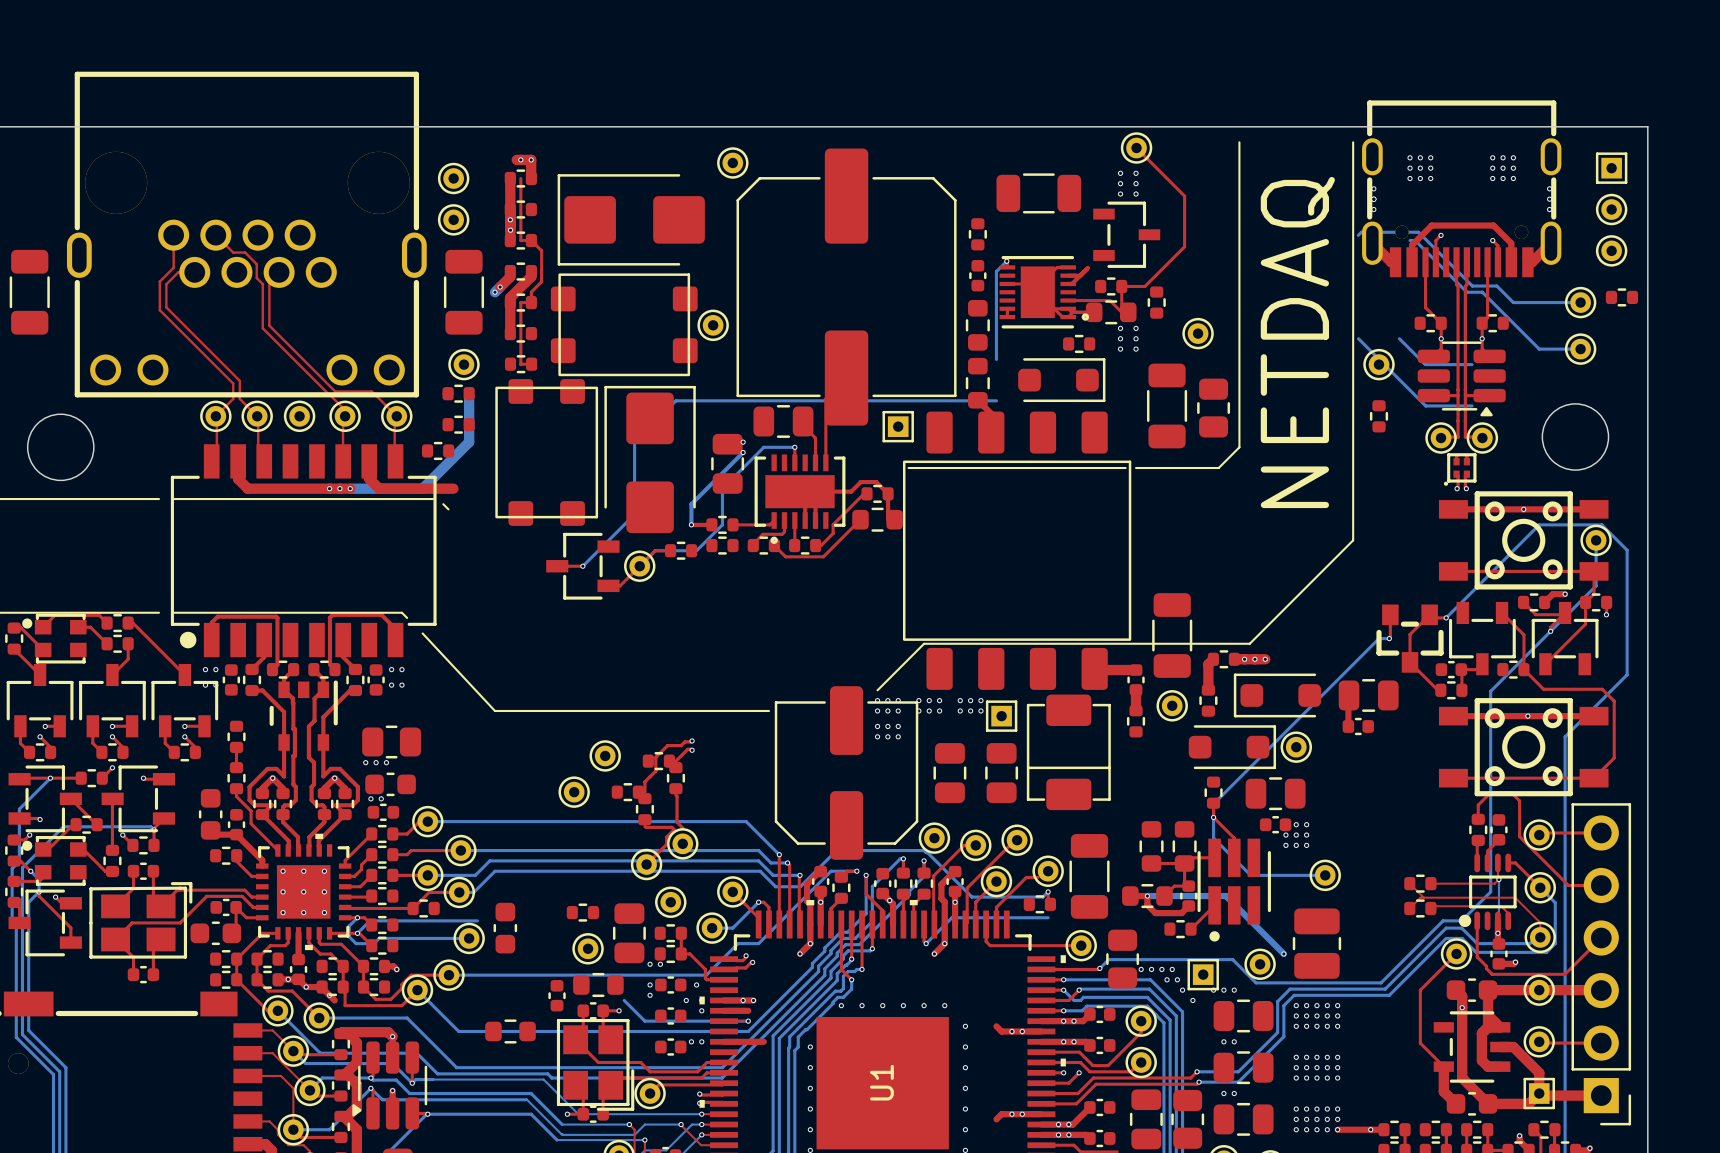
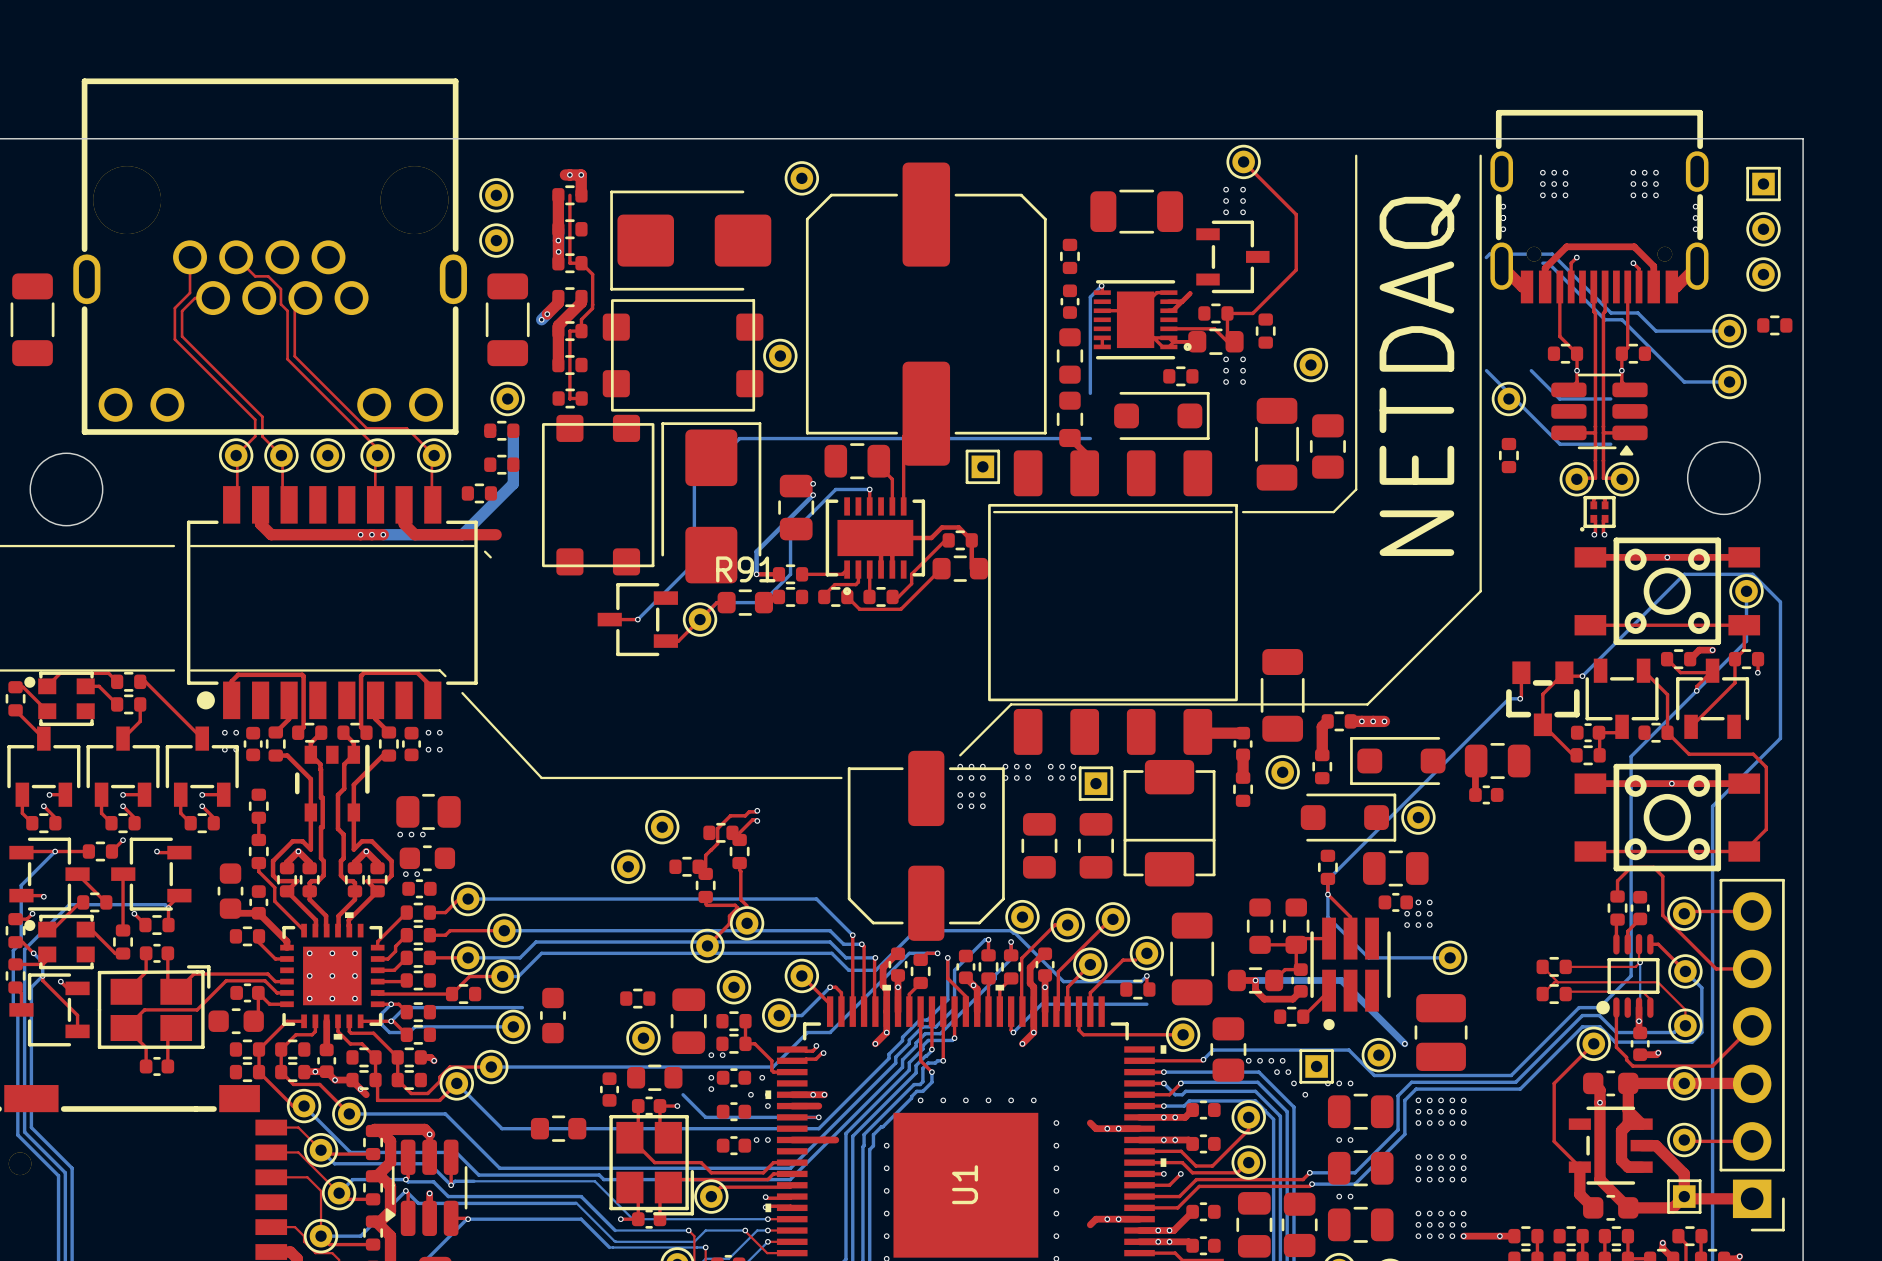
part: (681, 550) -> none
R91: none -> (745, 602)

